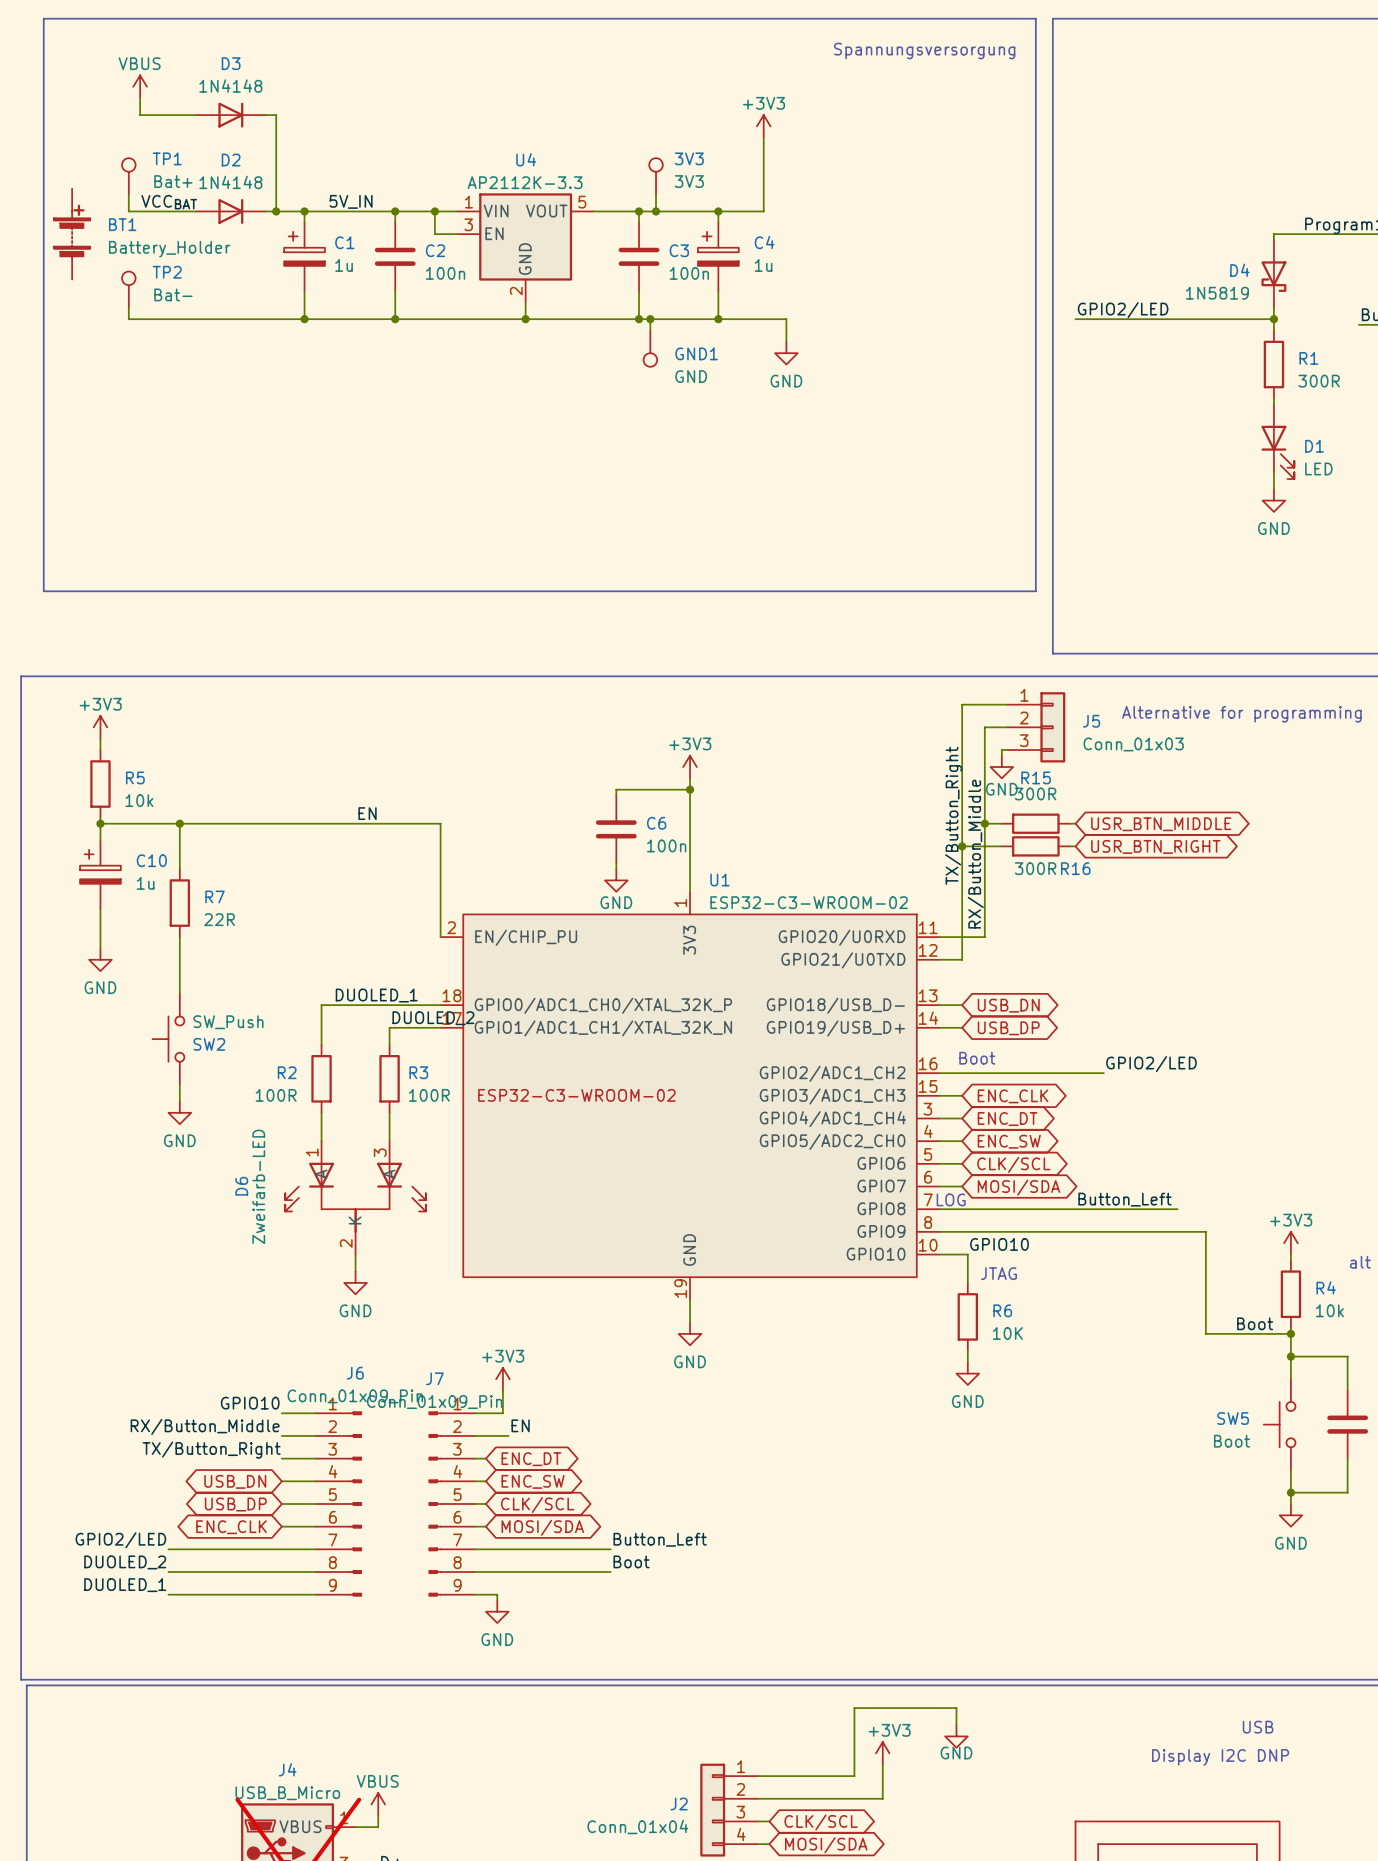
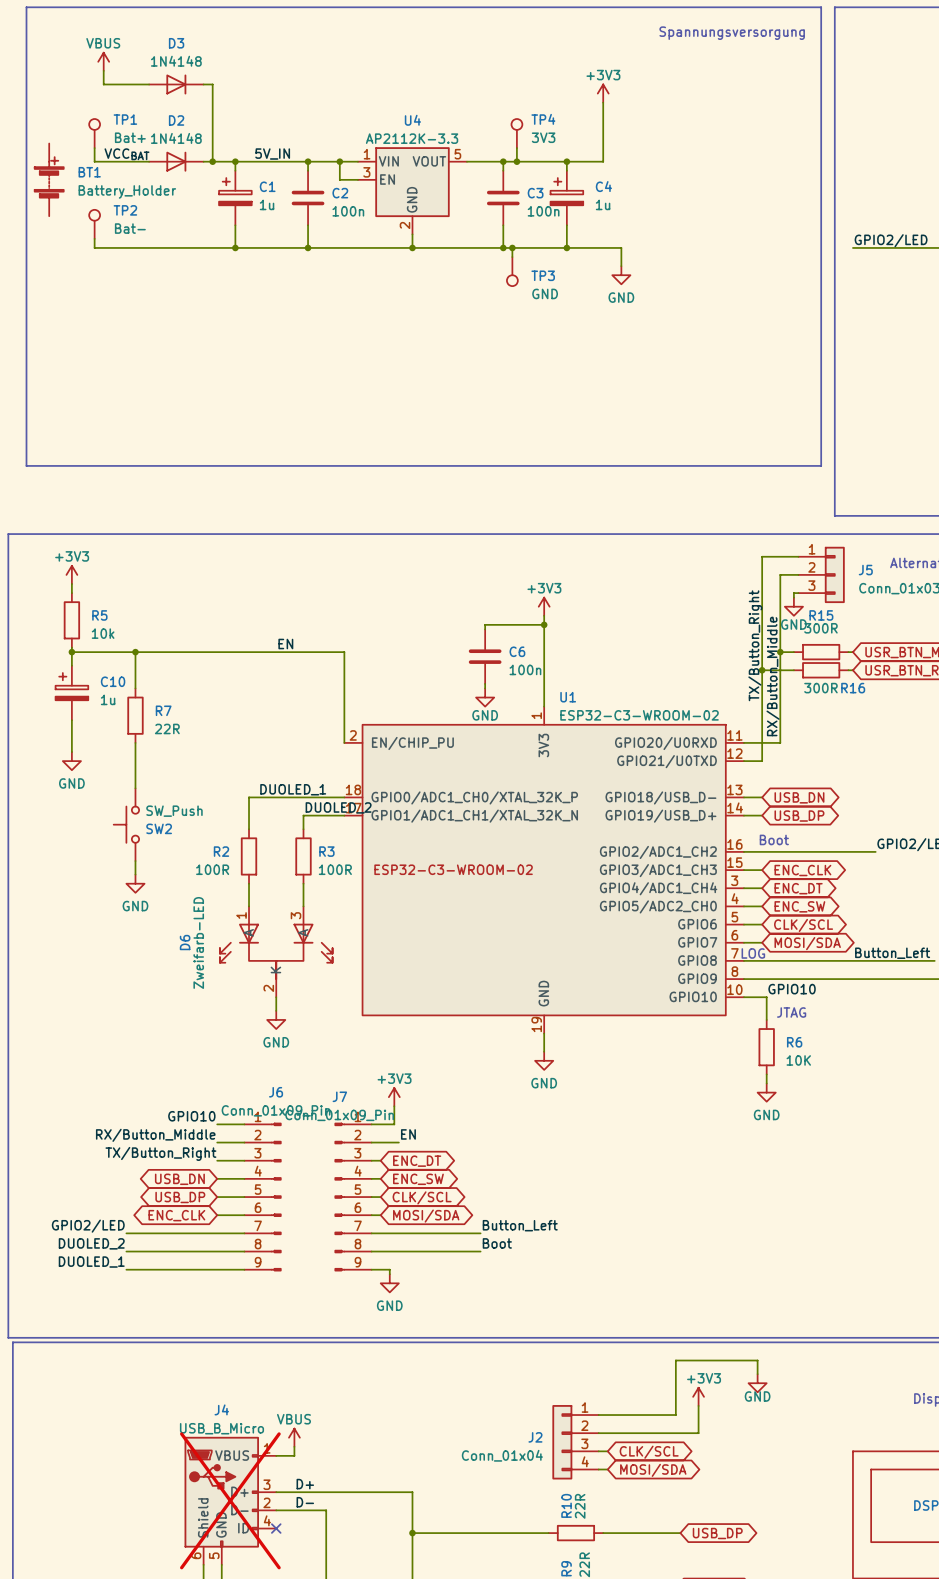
3V3 name: 3V3 (689, 158) -> TP4 (543, 119)
GND1 name: GND1 (696, 353) -> TP3 (543, 275)

